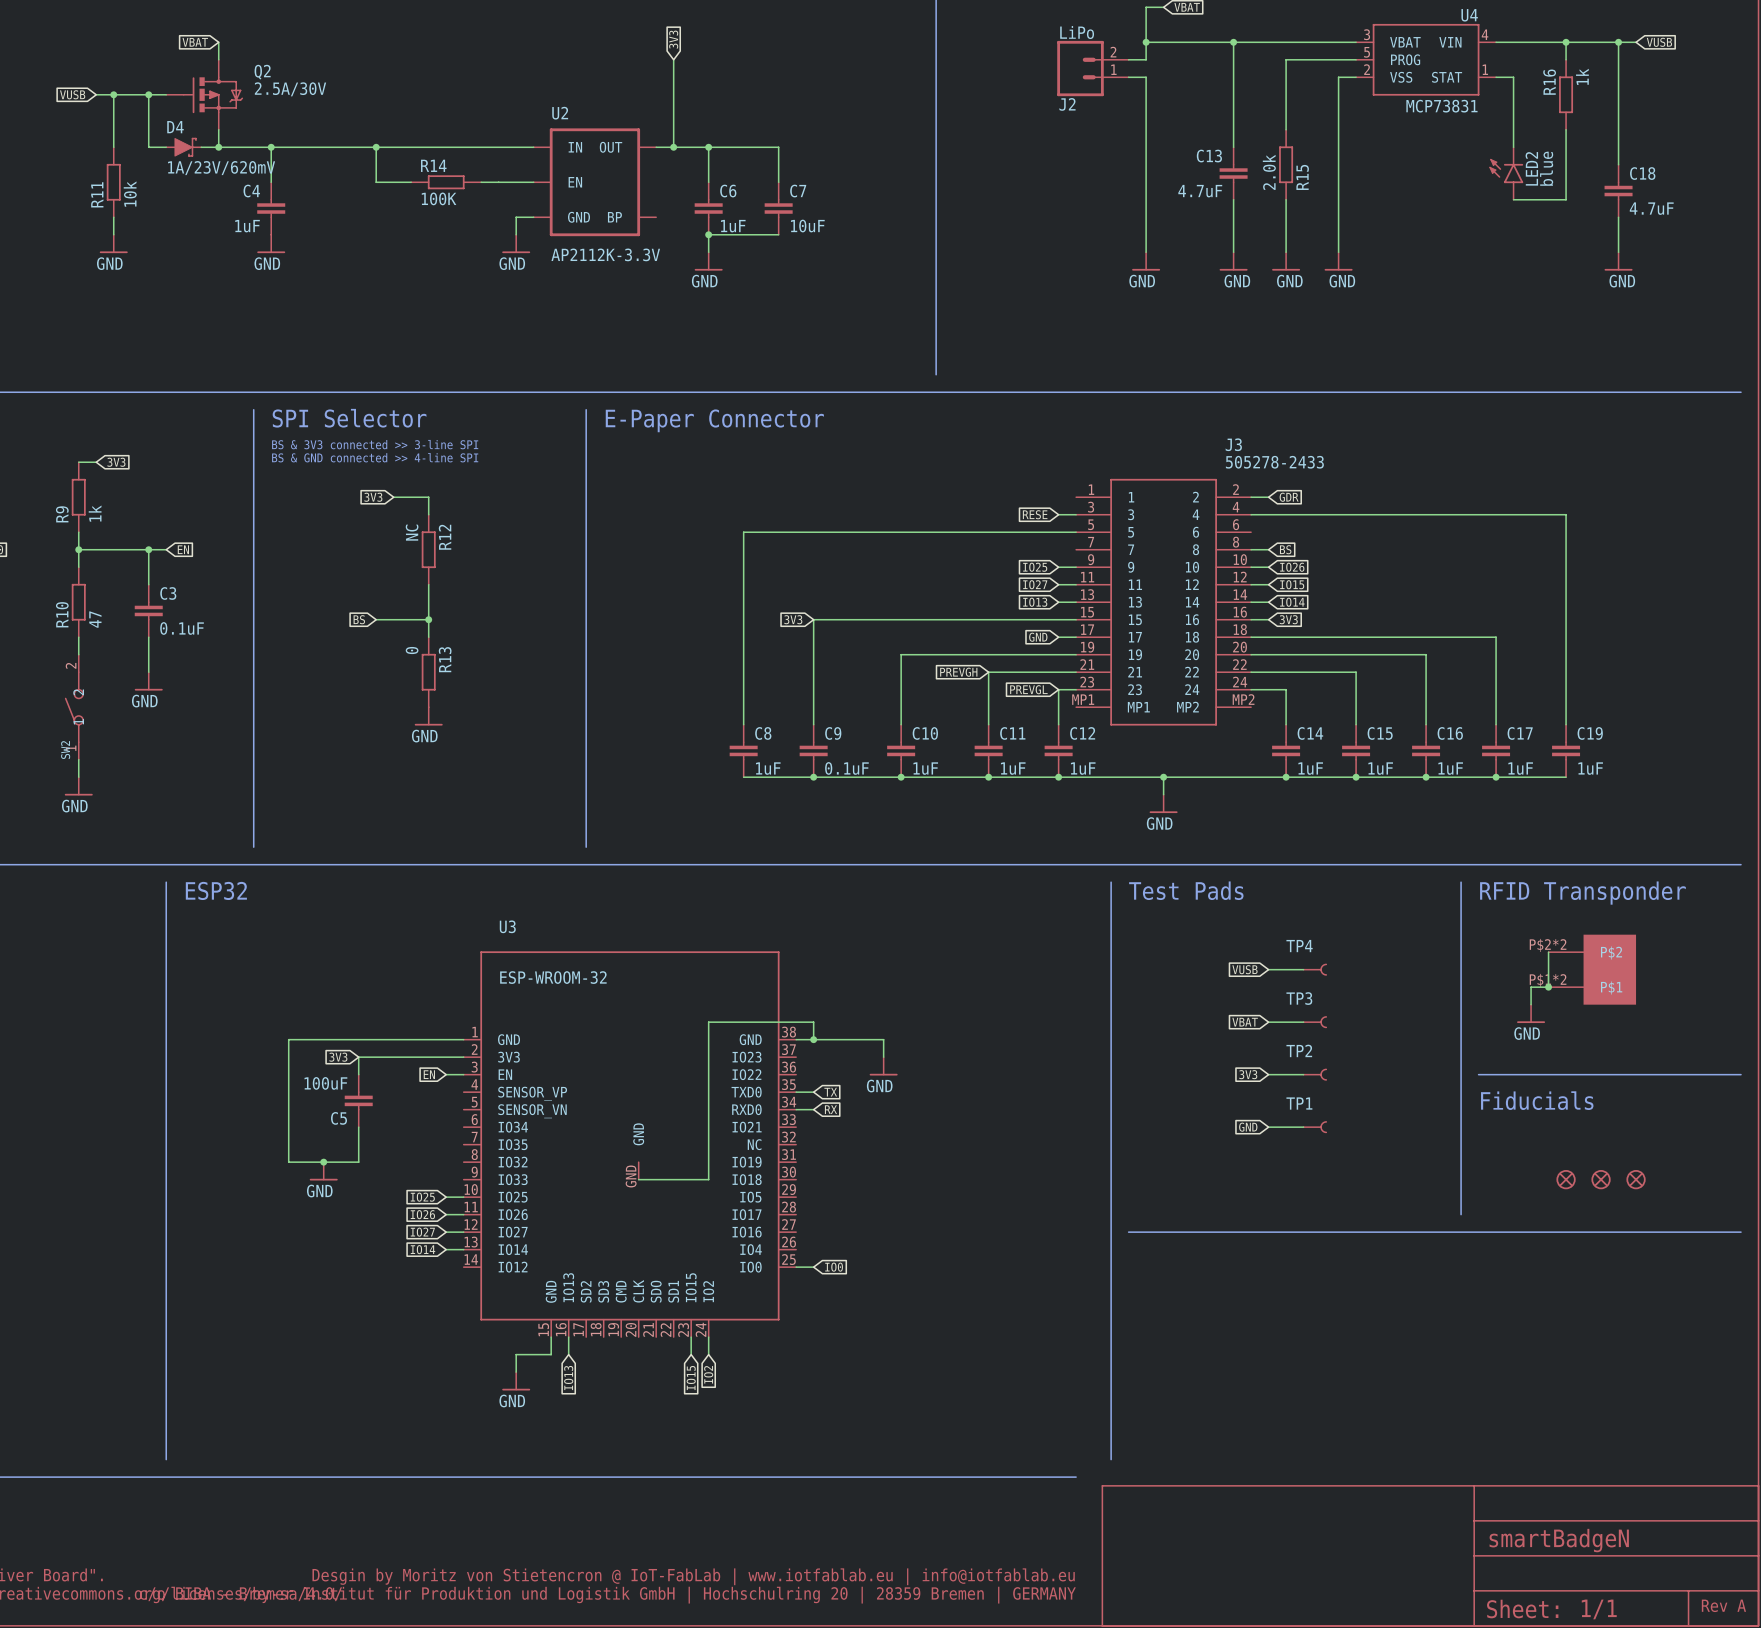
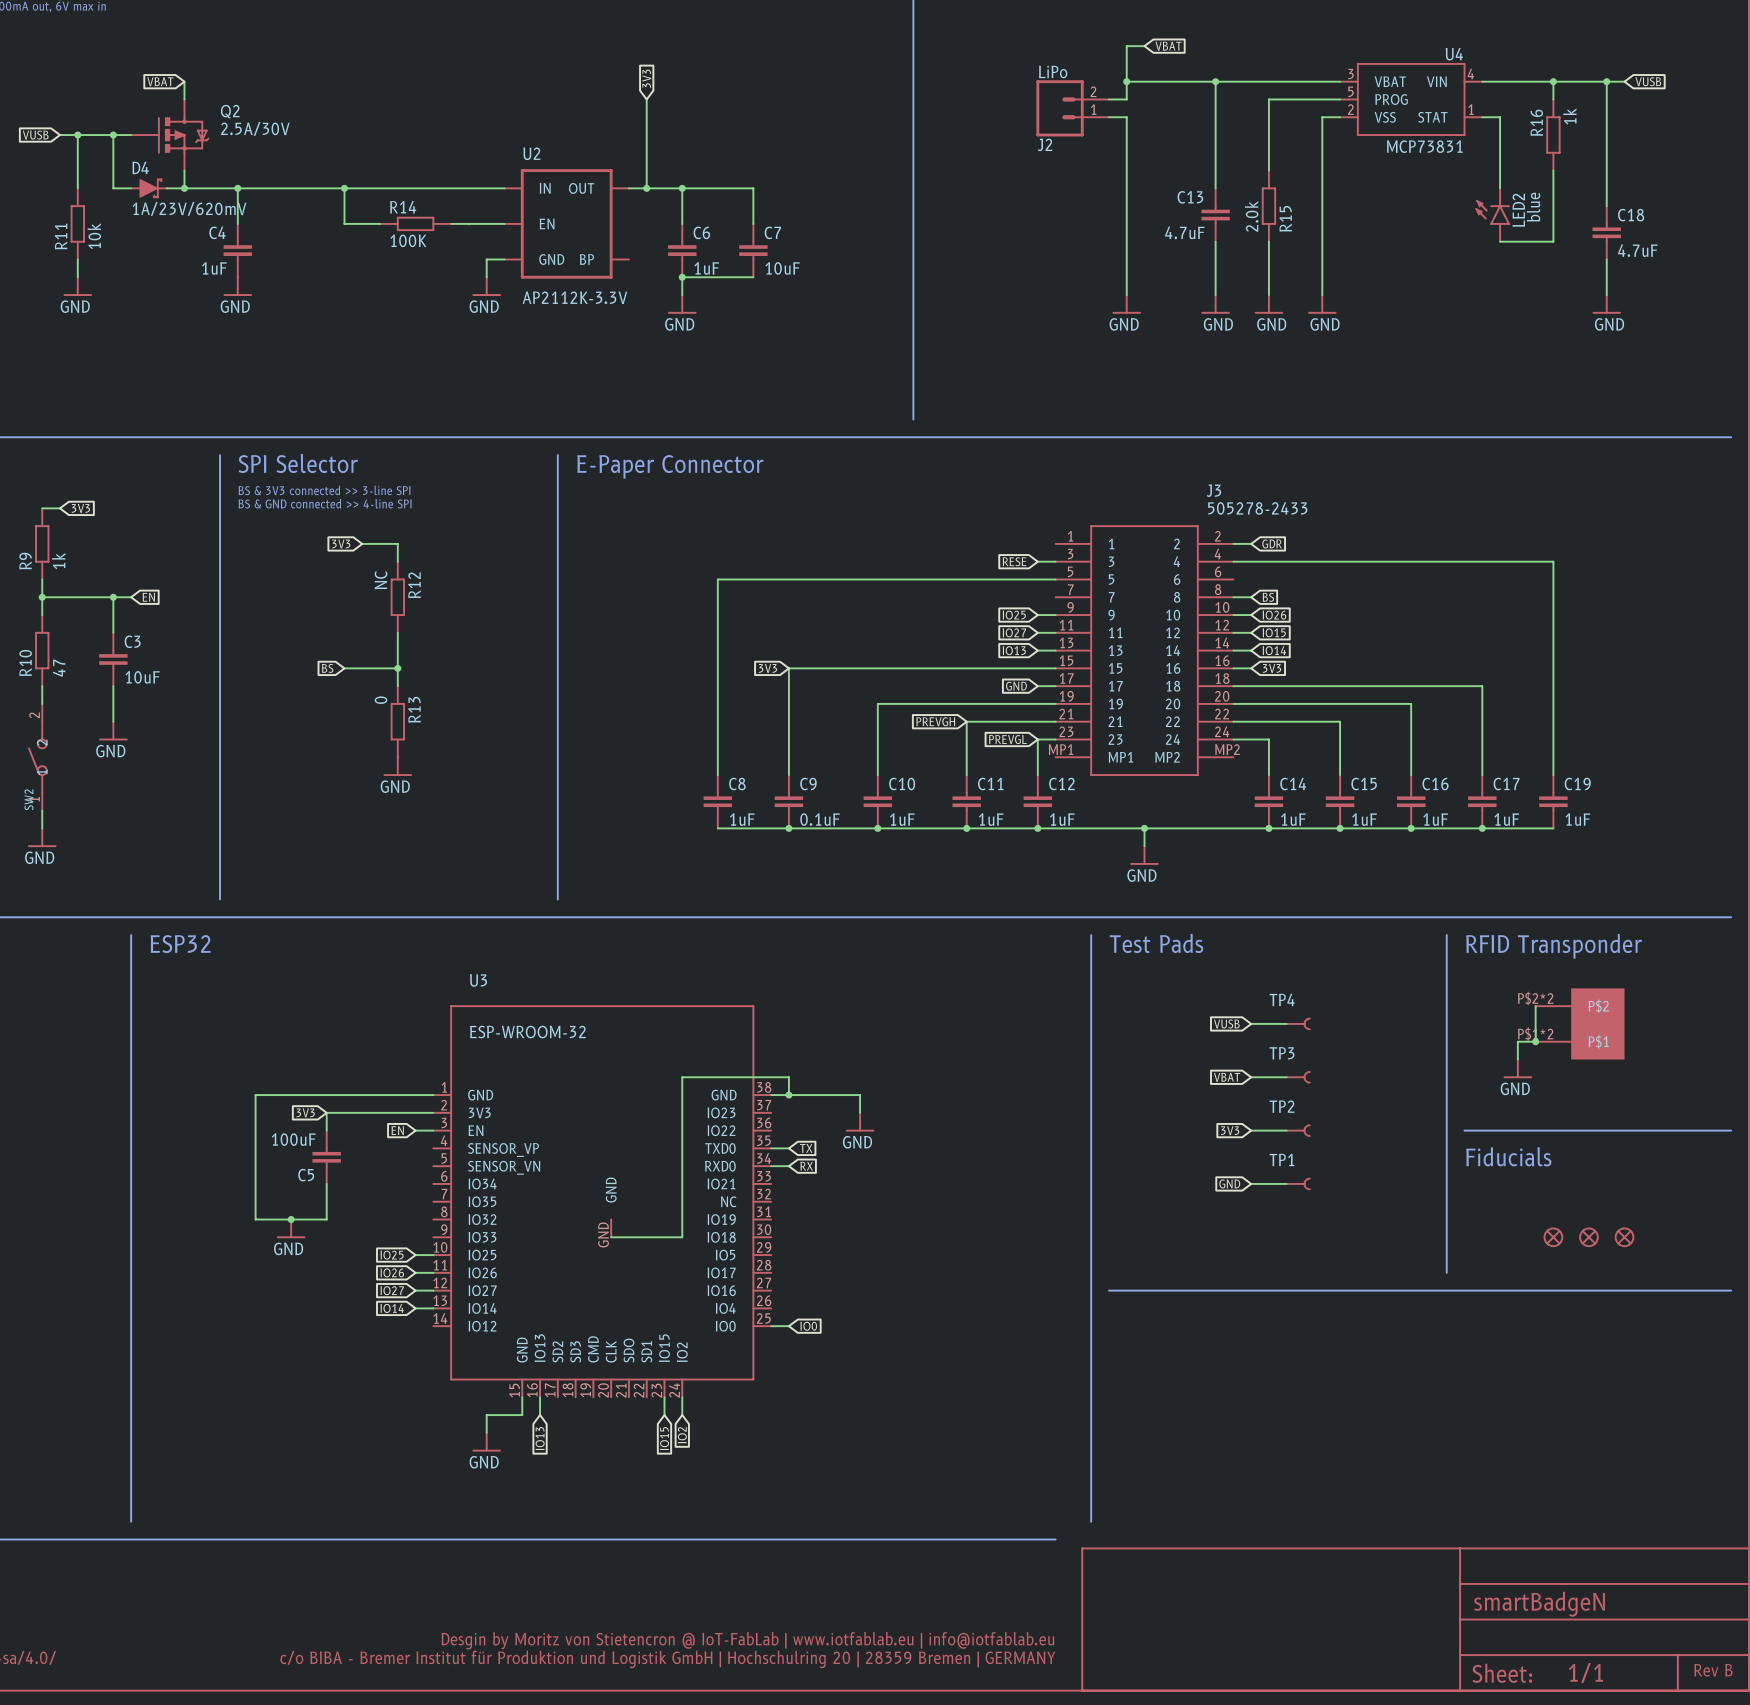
C3 value: 0.1uF (182, 628) -> 10uF (142, 677)
text: Rev A (1723, 1605) -> Rev B (1713, 1670)

